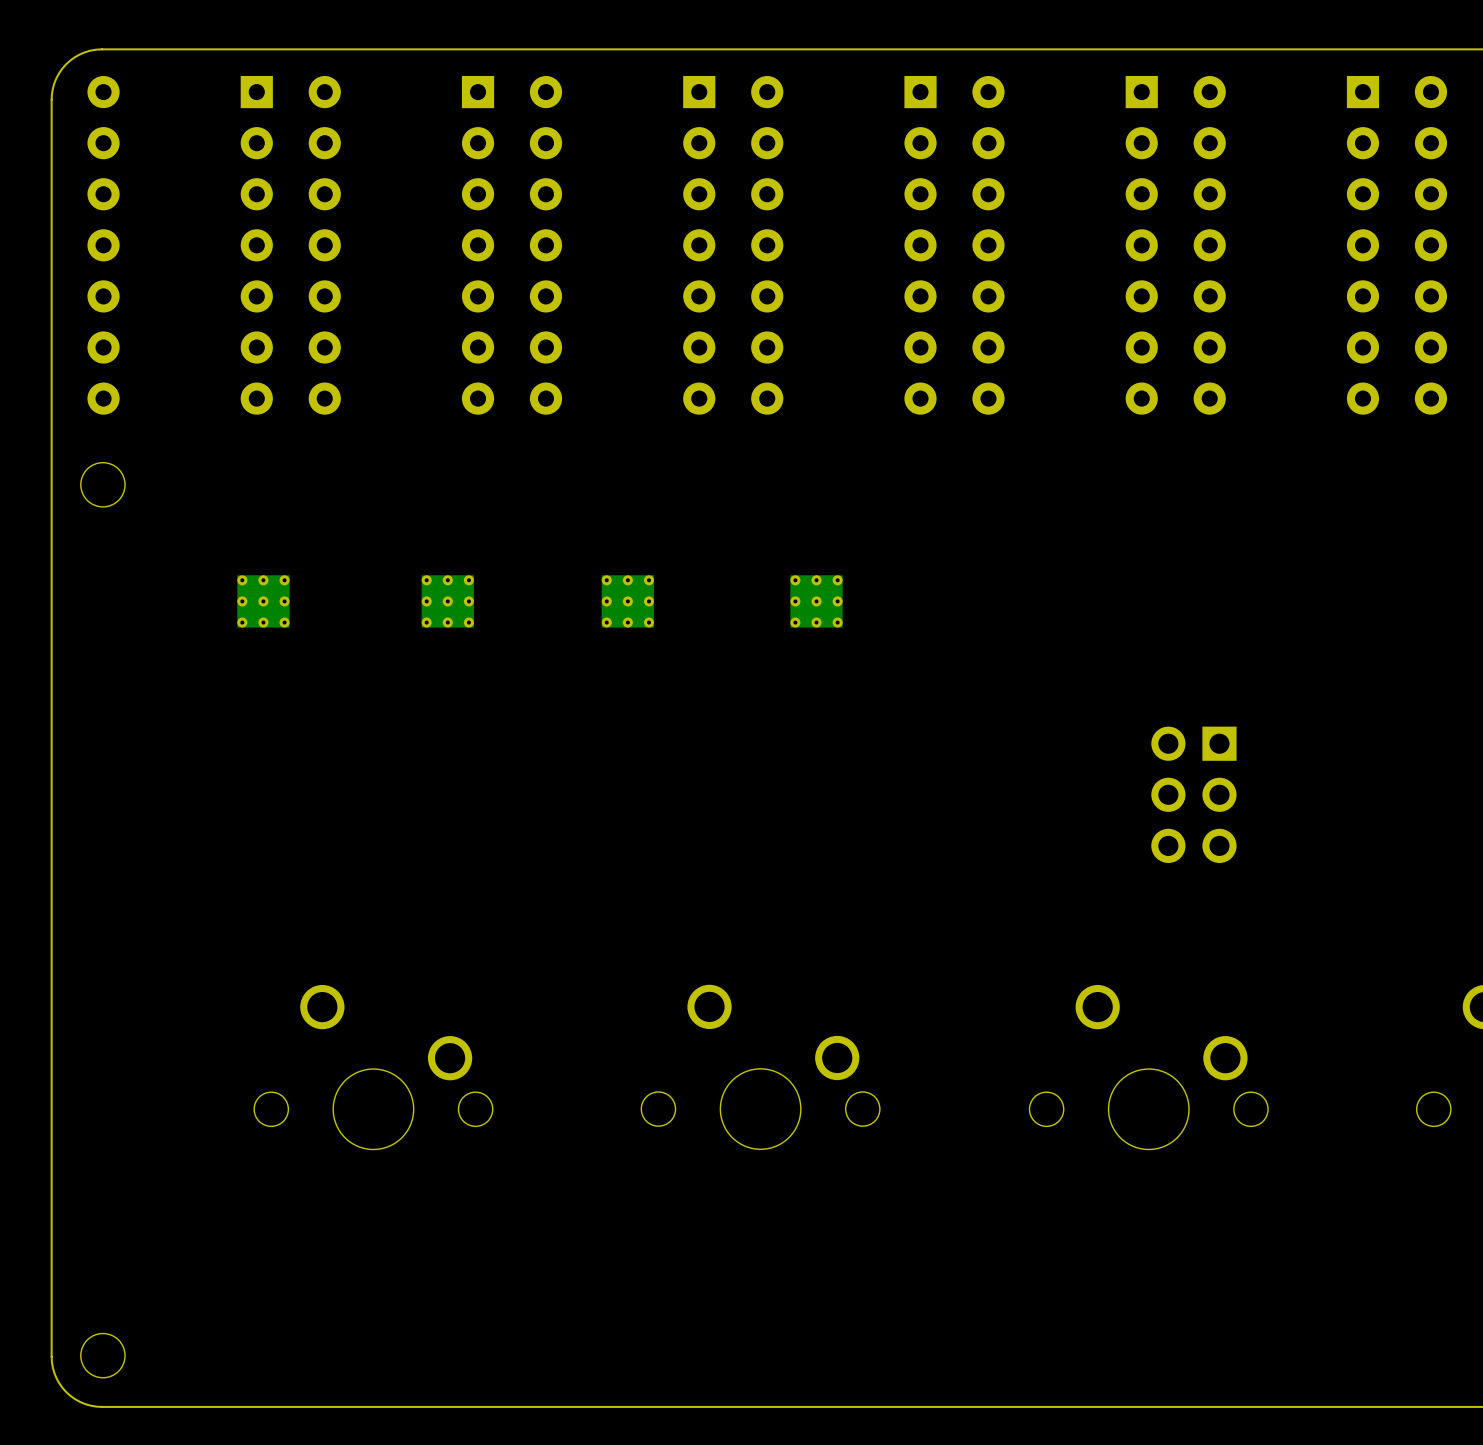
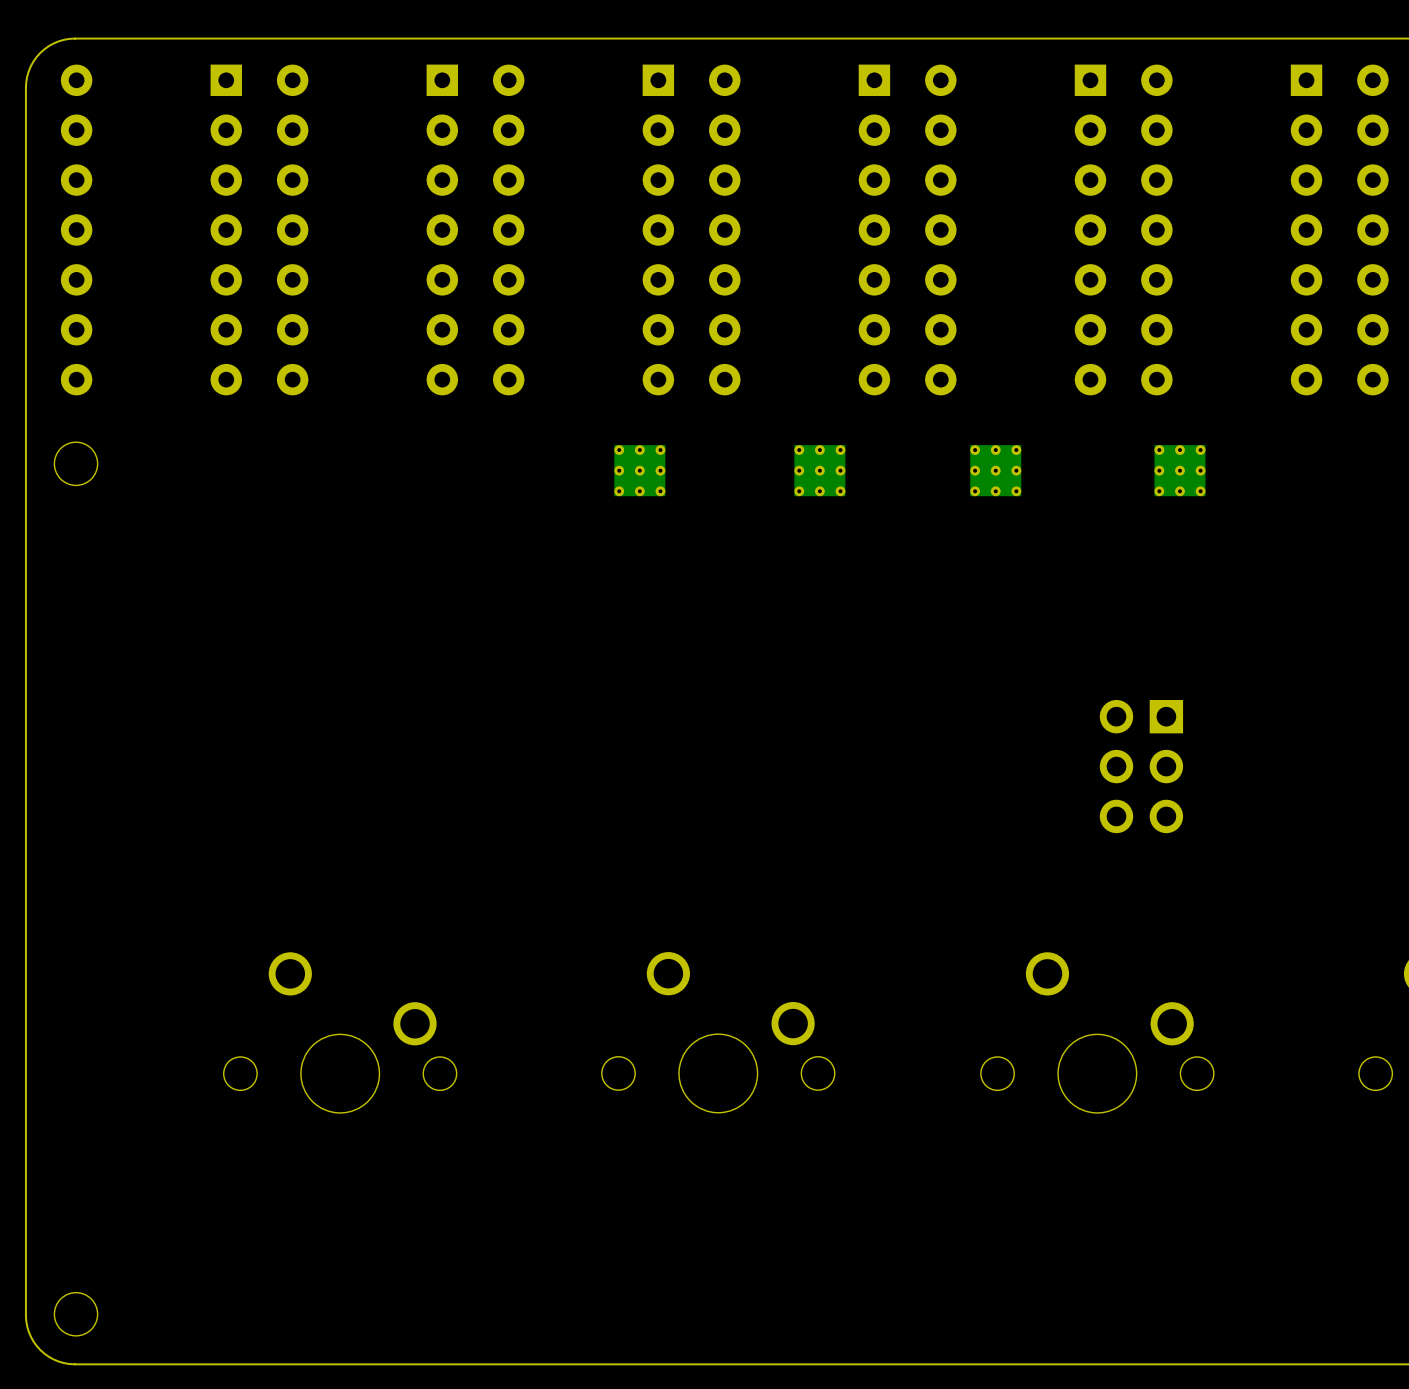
part: none -> (639, 470)
part: none -> (819, 470)
part: none -> (995, 470)
part: none -> (1179, 470)
part: (263, 601) -> none
part: (447, 601) -> none
part: (627, 601) -> none
part: (816, 601) -> none

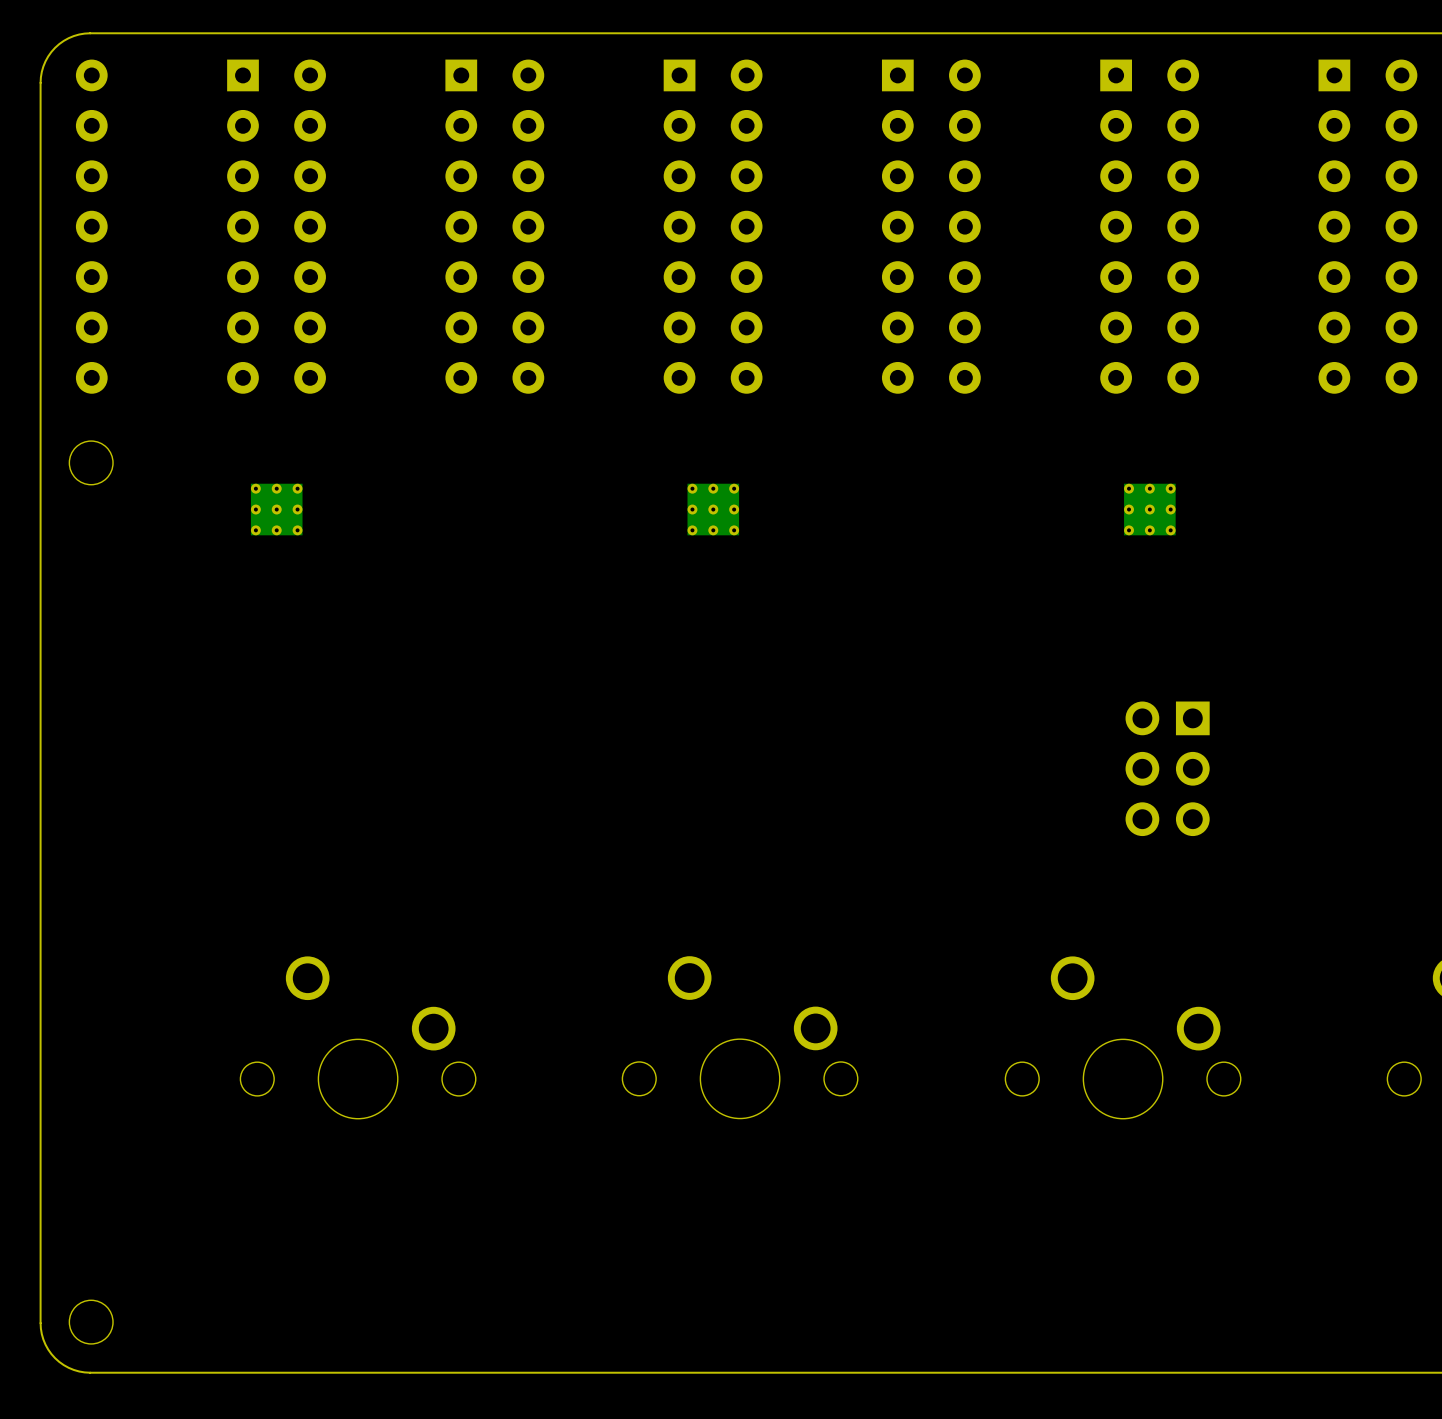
part position: (639, 470) -> (713, 509)
part: (819, 470) -> none
part: (995, 470) -> none
part: (1179, 470) -> none
part: none -> (276, 509)
part: none -> (1149, 509)

